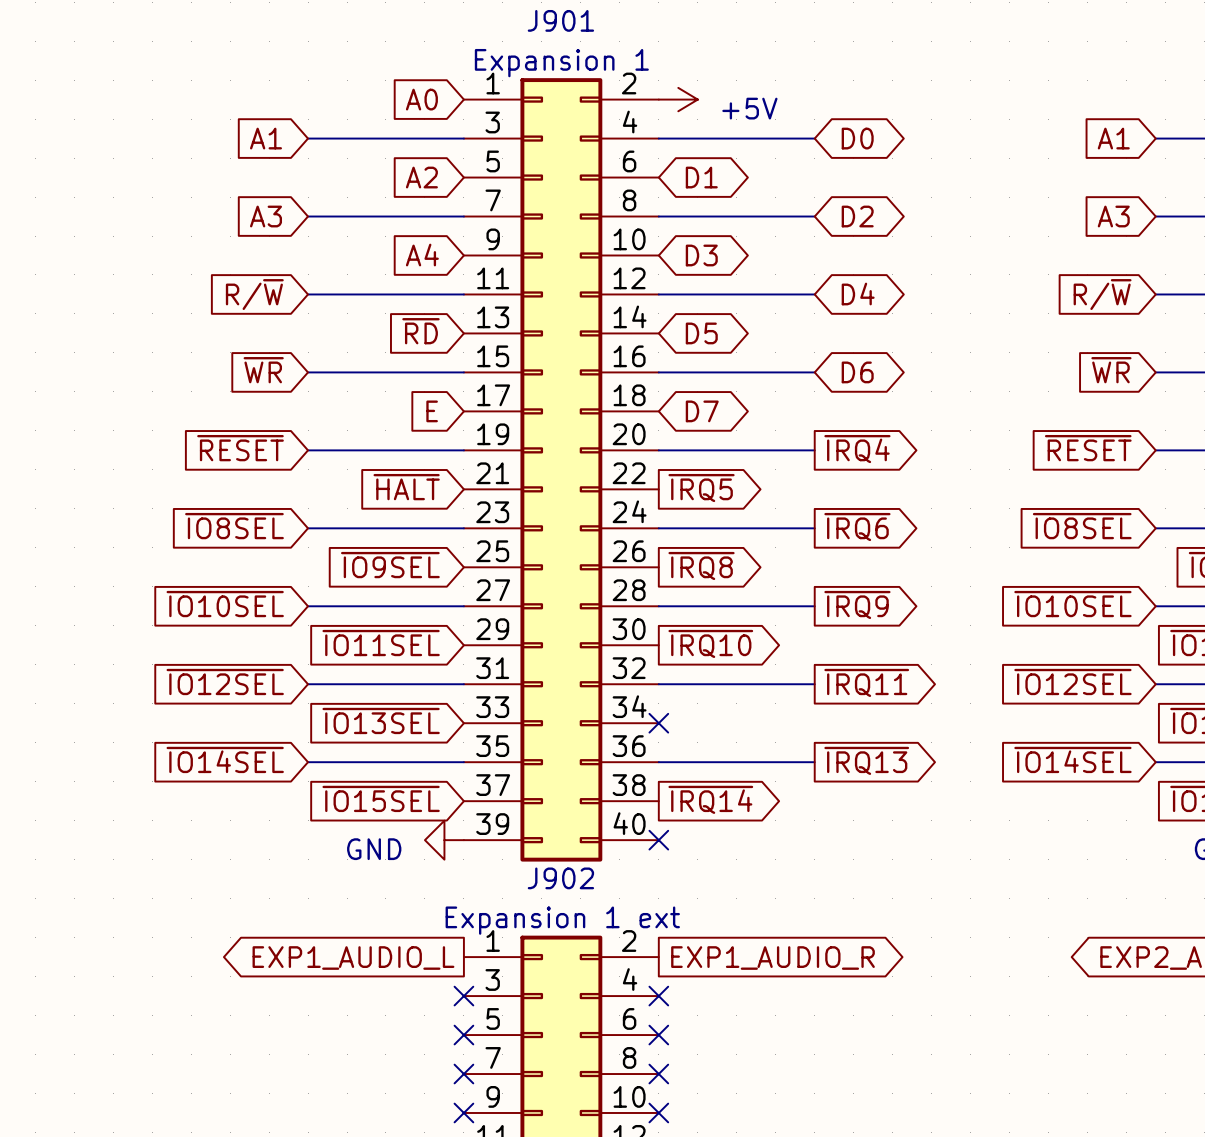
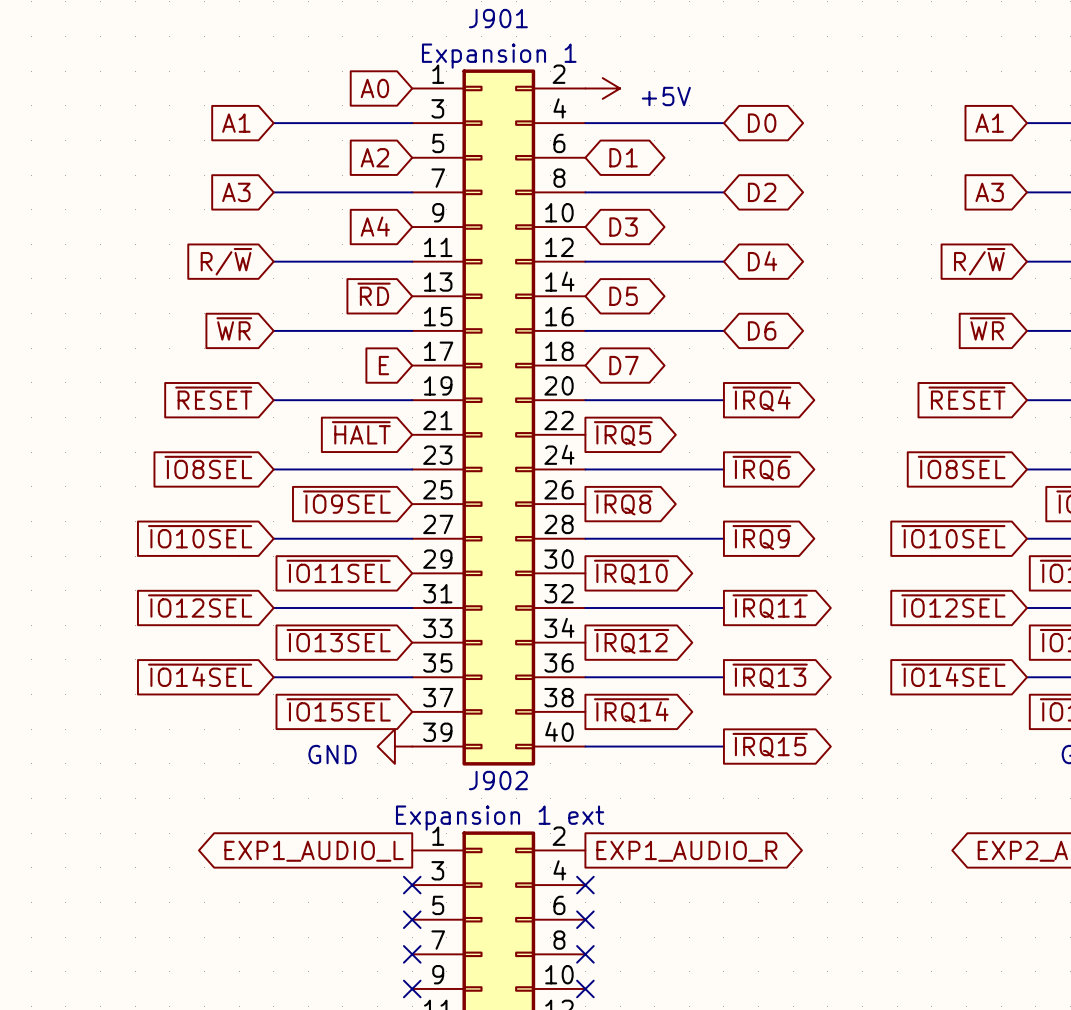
global label: none -> ~{IRQ12} (631, 641)
no-connect mark: (658, 723) -> none
global label: none -> ~{IRQ15} (770, 745)
wire: none -> (585, 746) (723, 746)
no-connect mark: (658, 840) -> none

